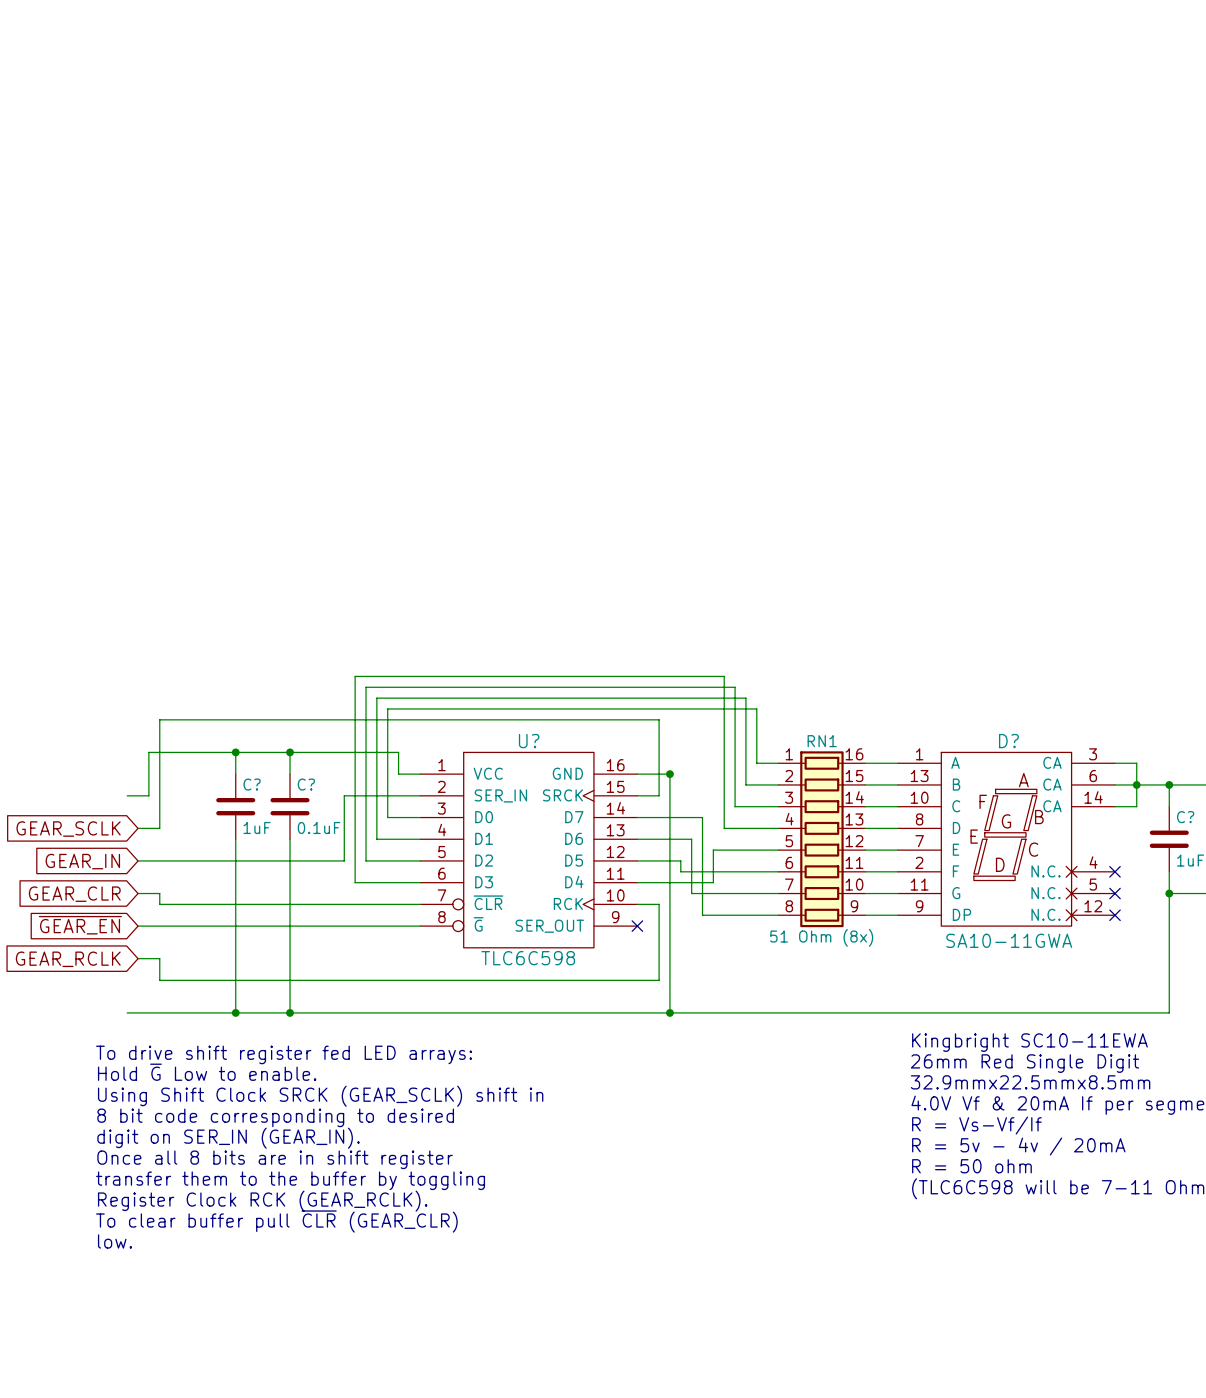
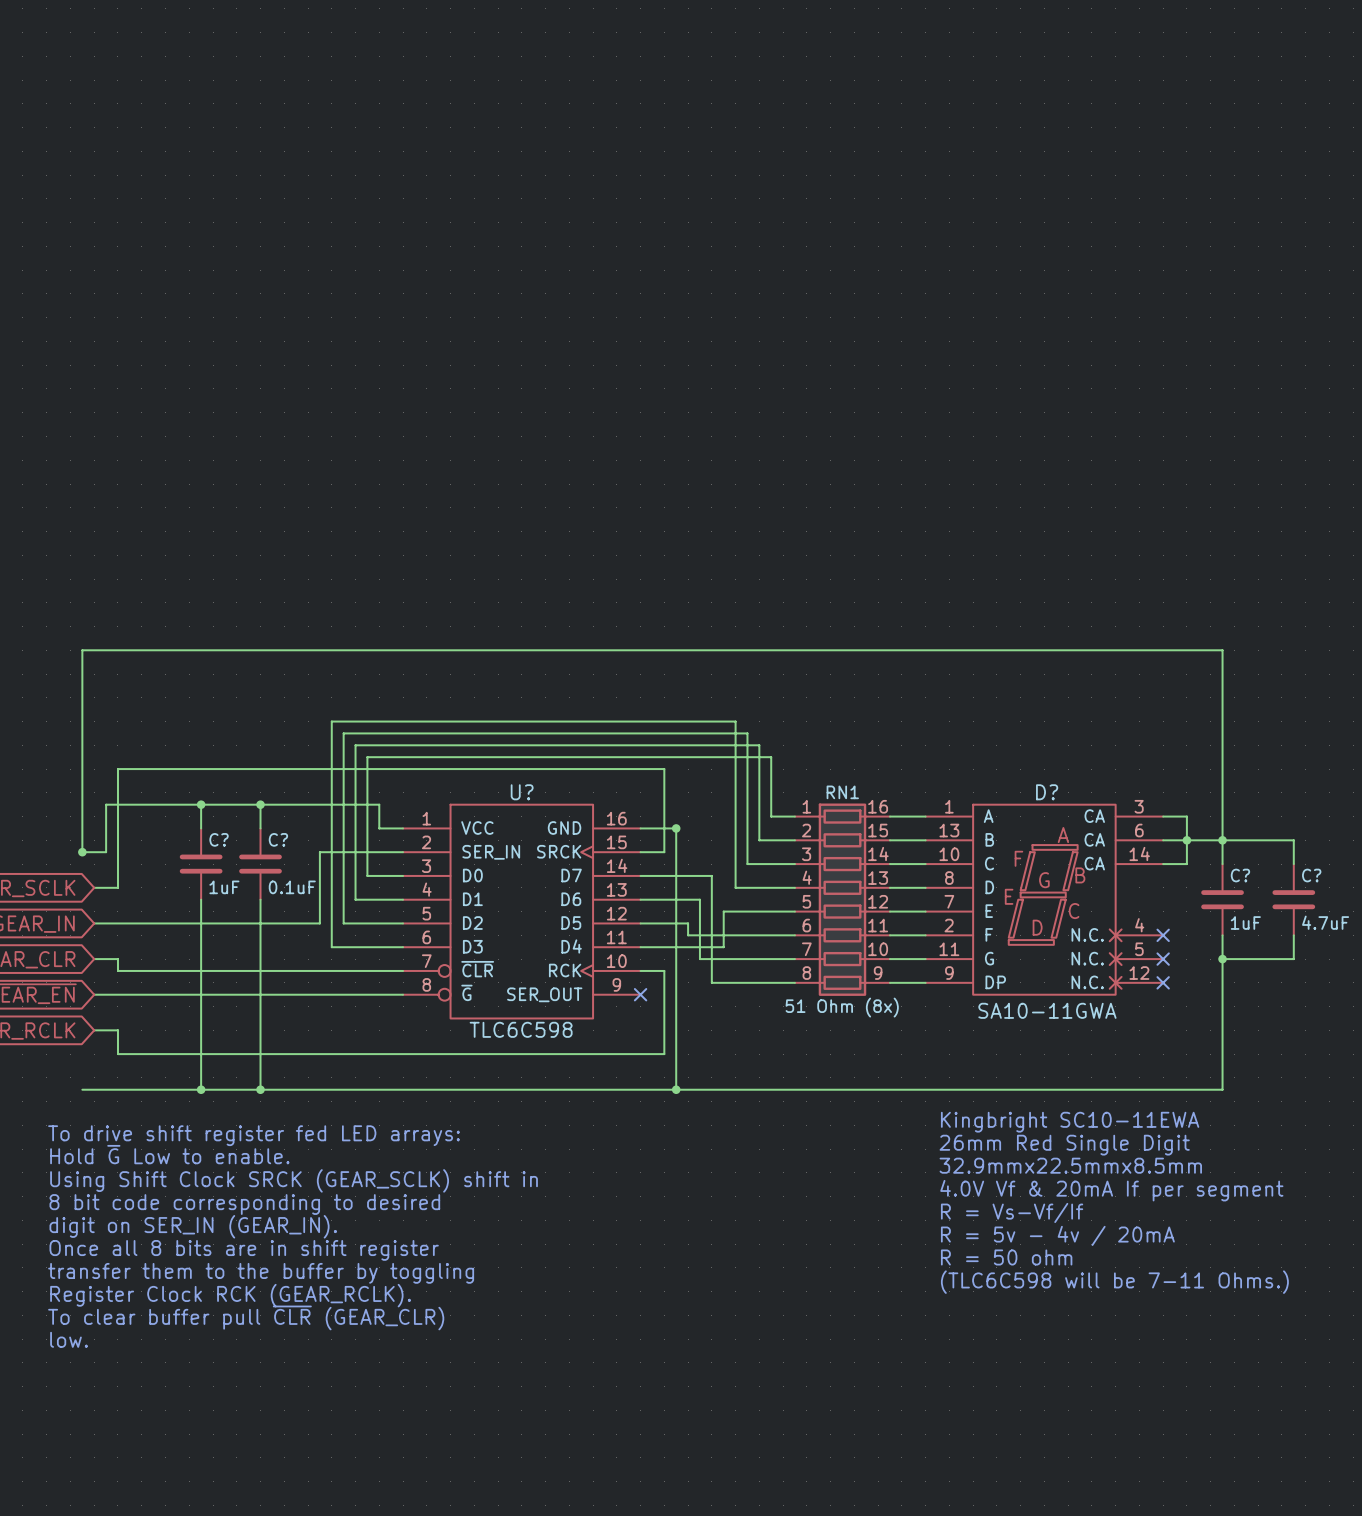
wire: none -> (1222, 840) (1222, 650) (82, 650) (82, 852)
junction: none -> (82, 852)

